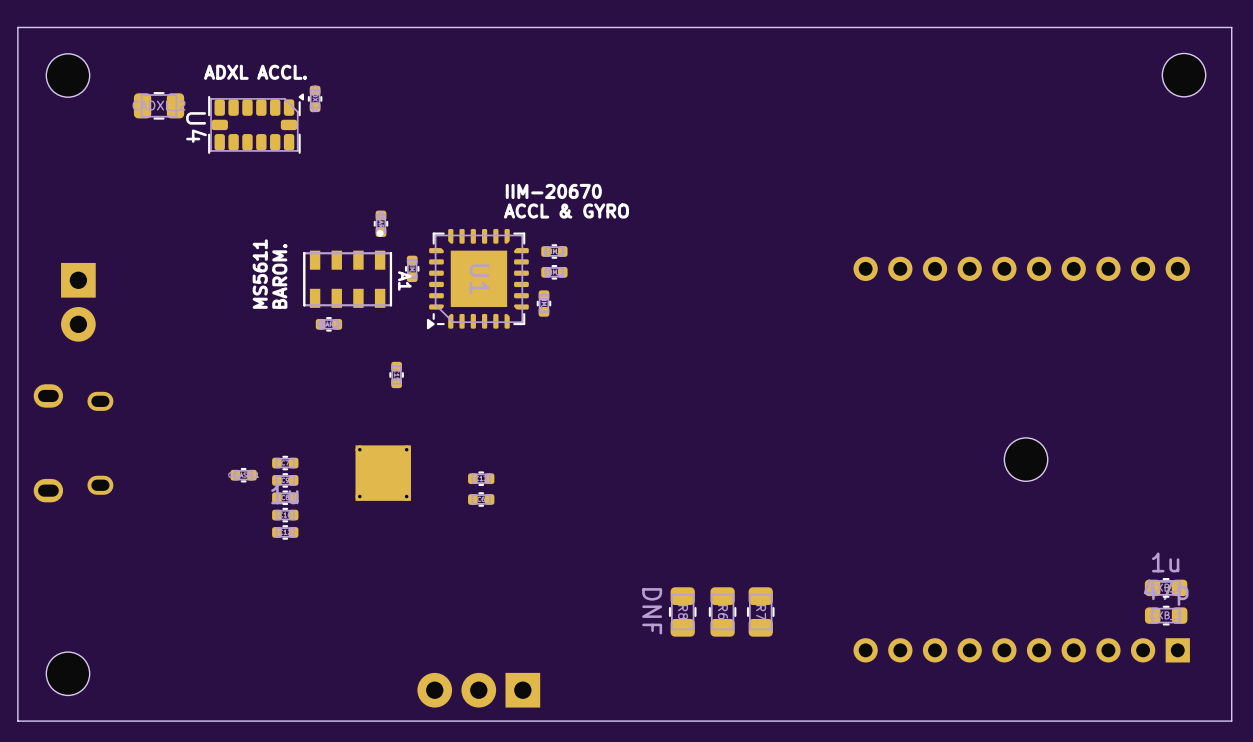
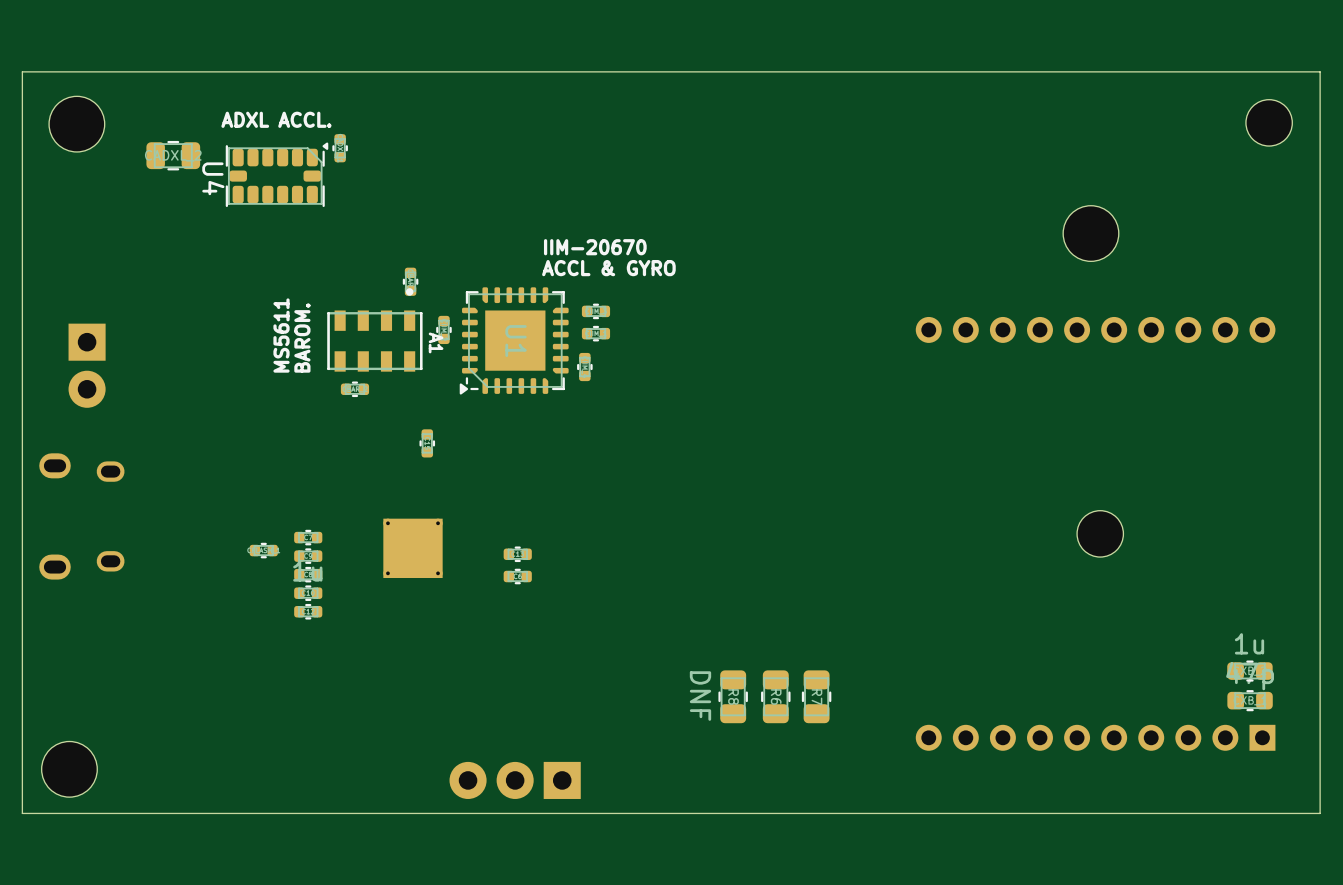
part footprint: [46, 53, 90, 98] -> [49, 96, 105, 152]
part: none -> (1090, 233)
part footprint: [46, 652, 90, 696] -> [41, 741, 98, 798]

